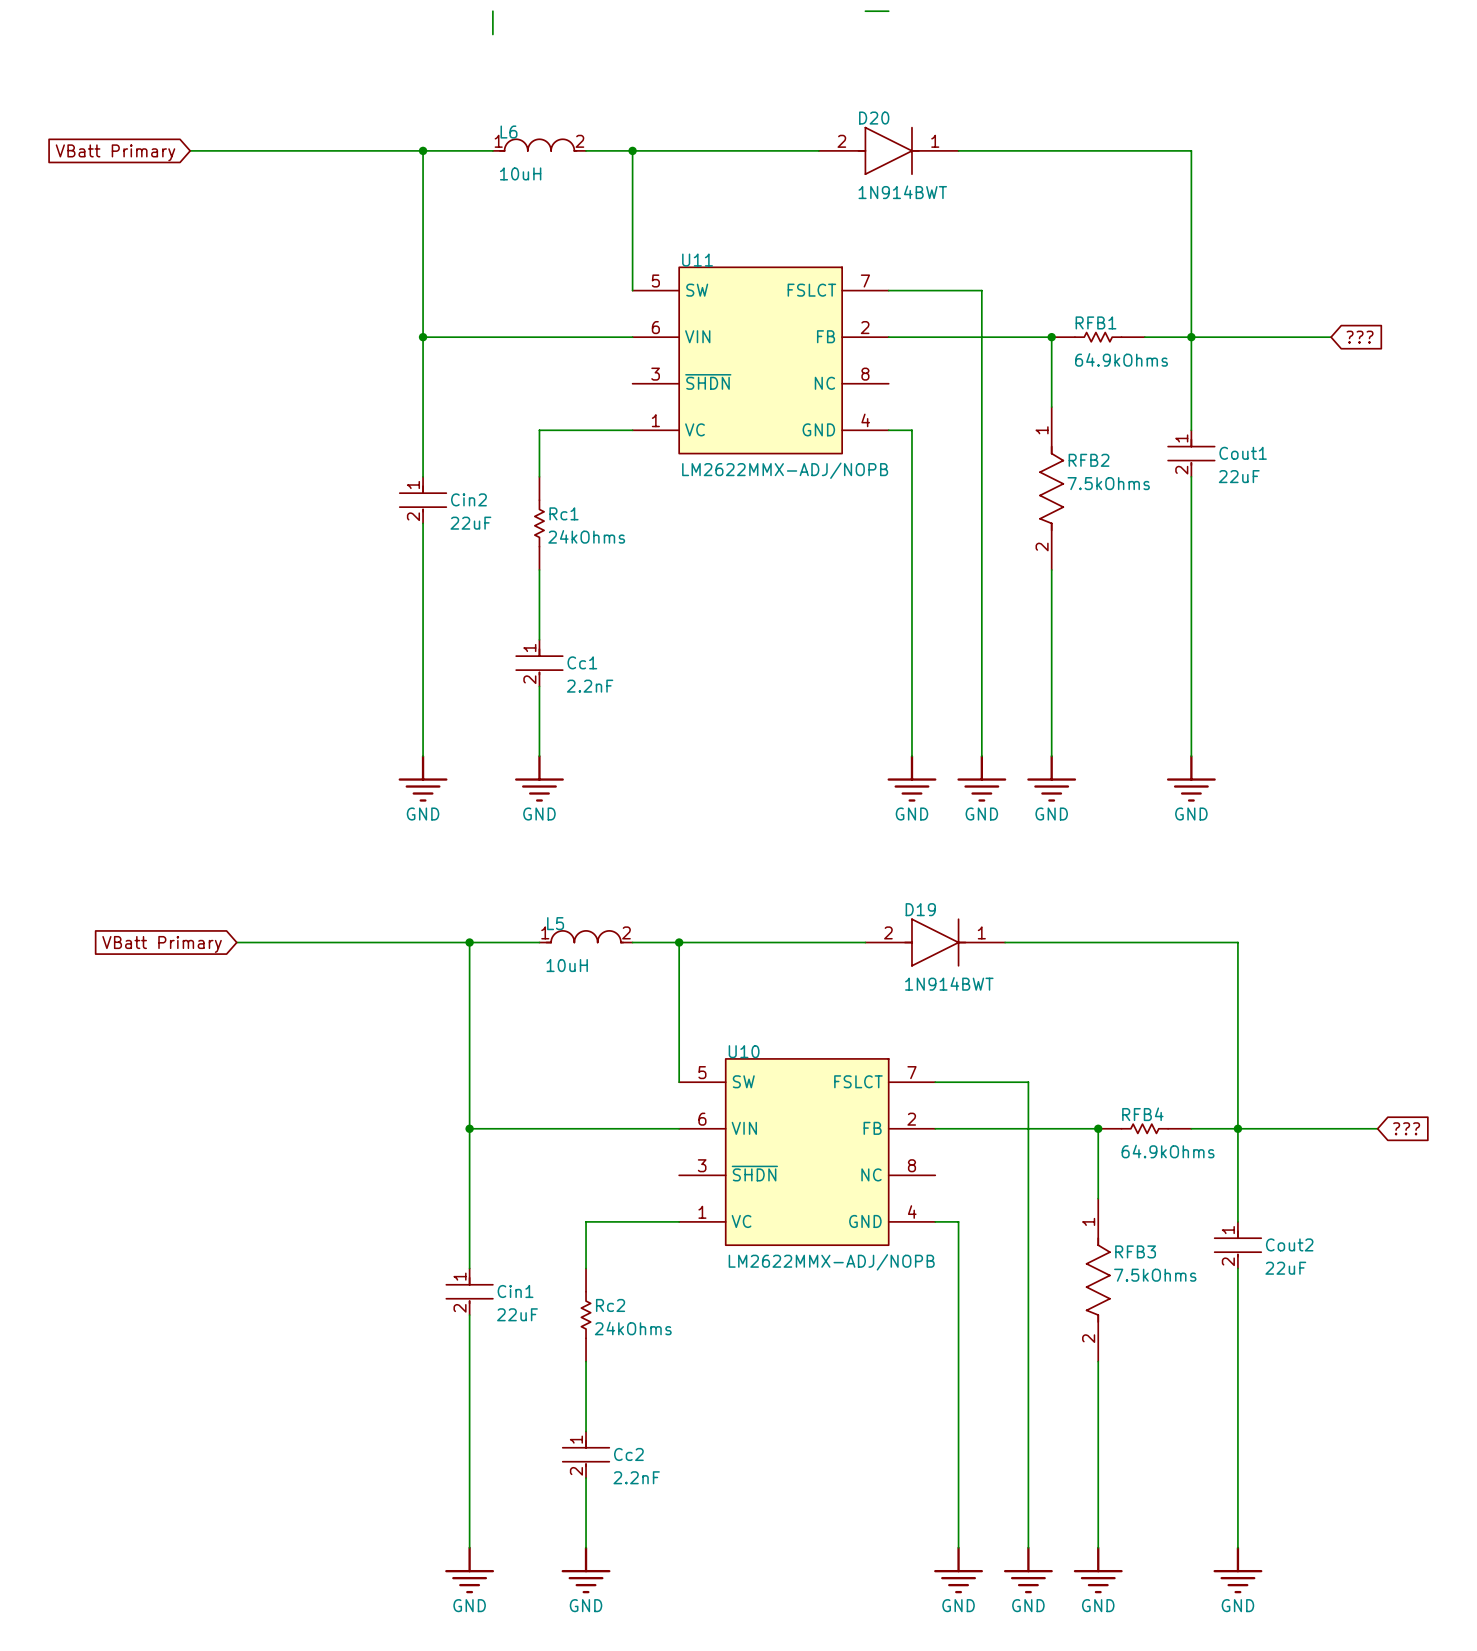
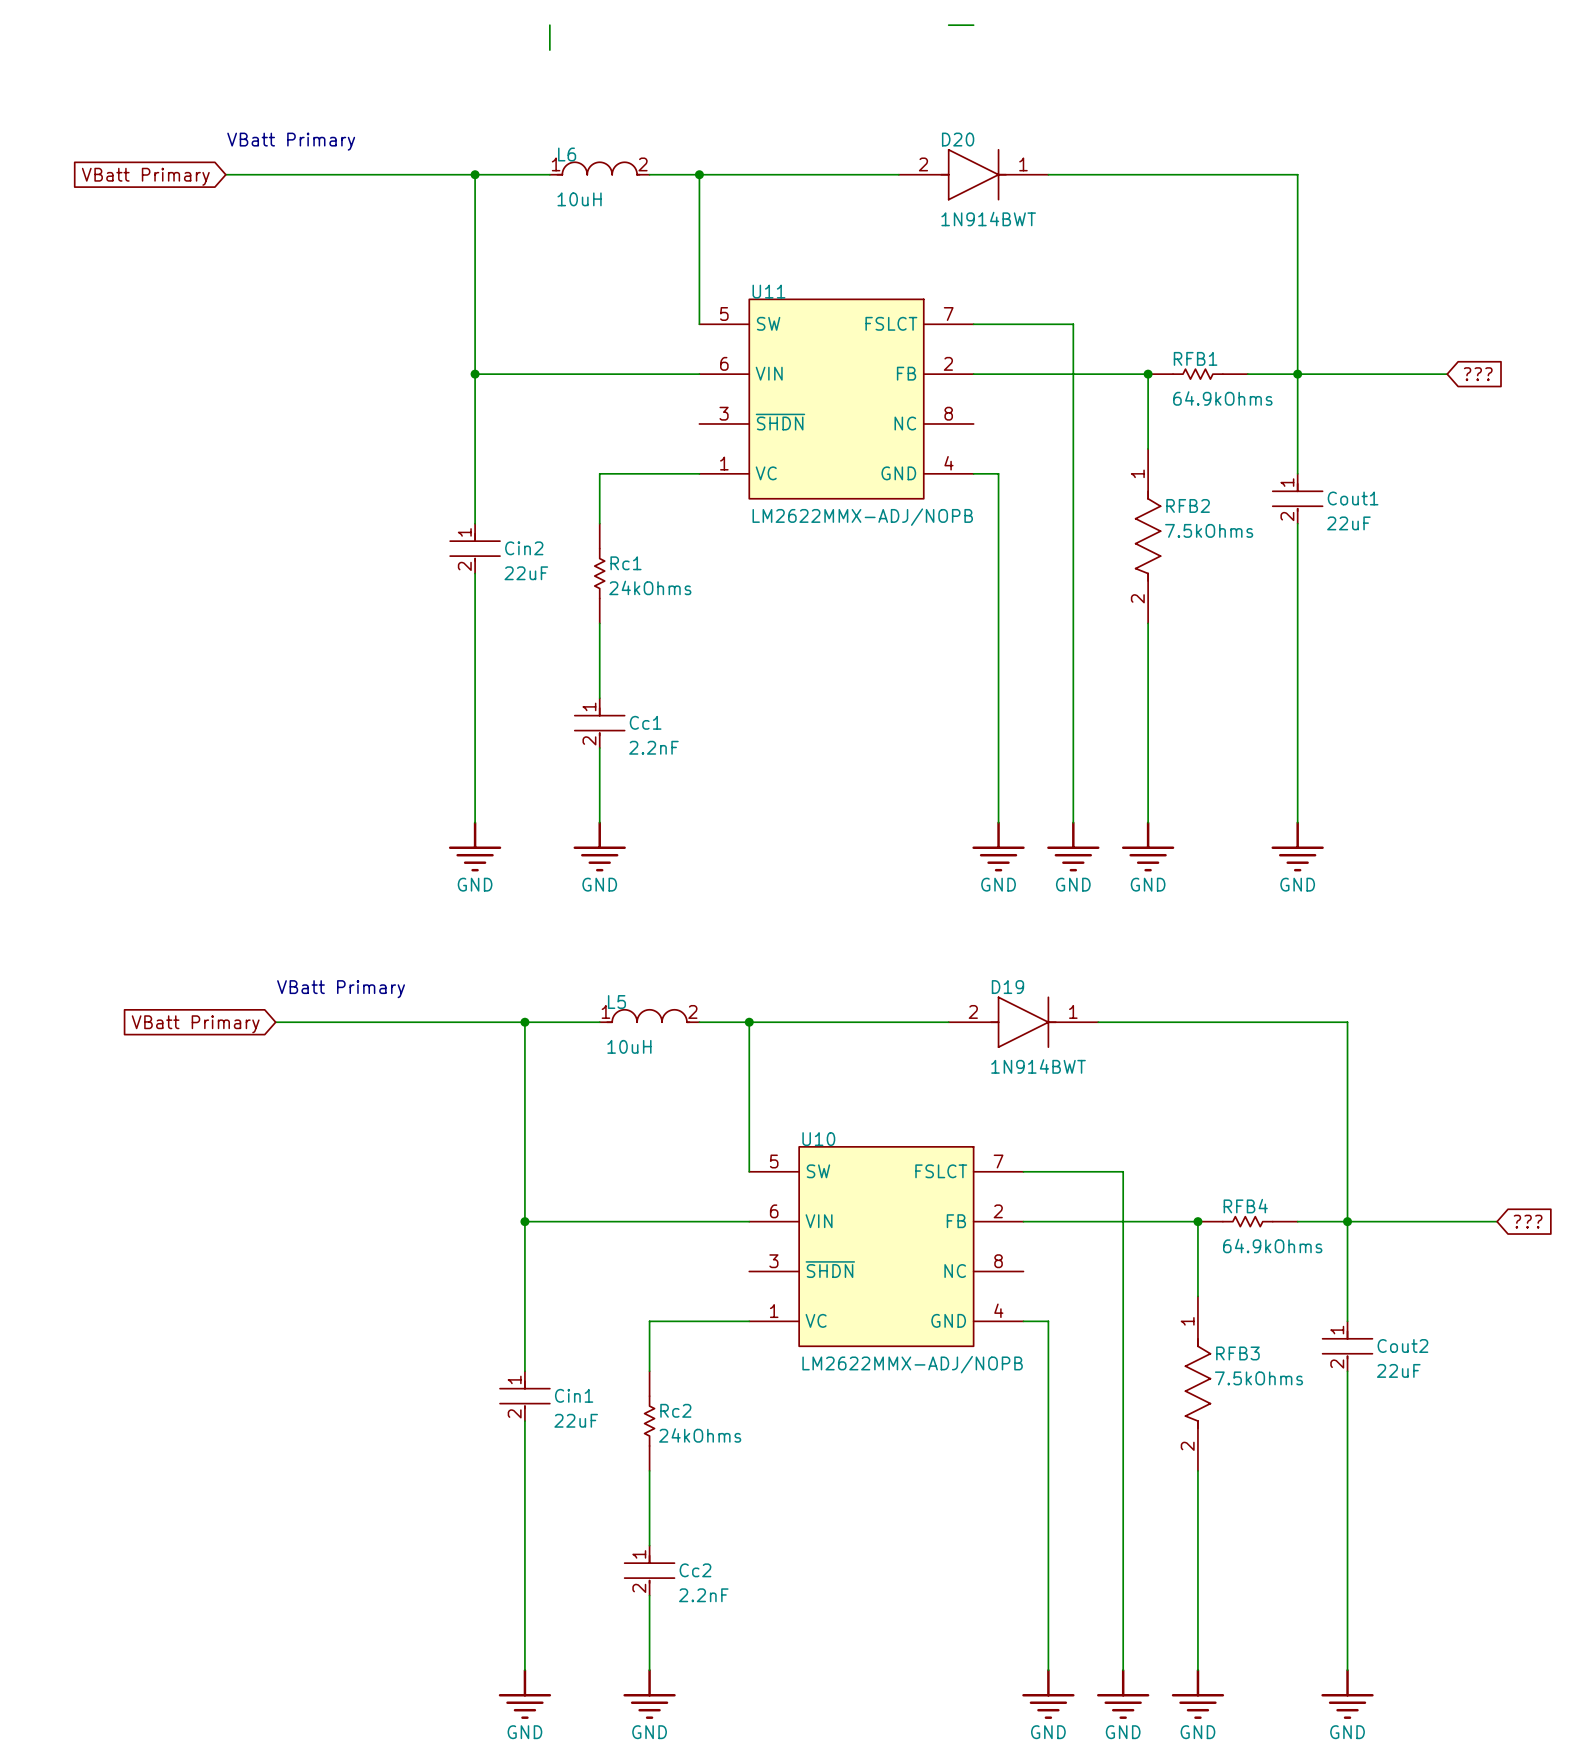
text: none -> VBatt Primary (291, 141)
text: none -> VBatt Primary (341, 989)

